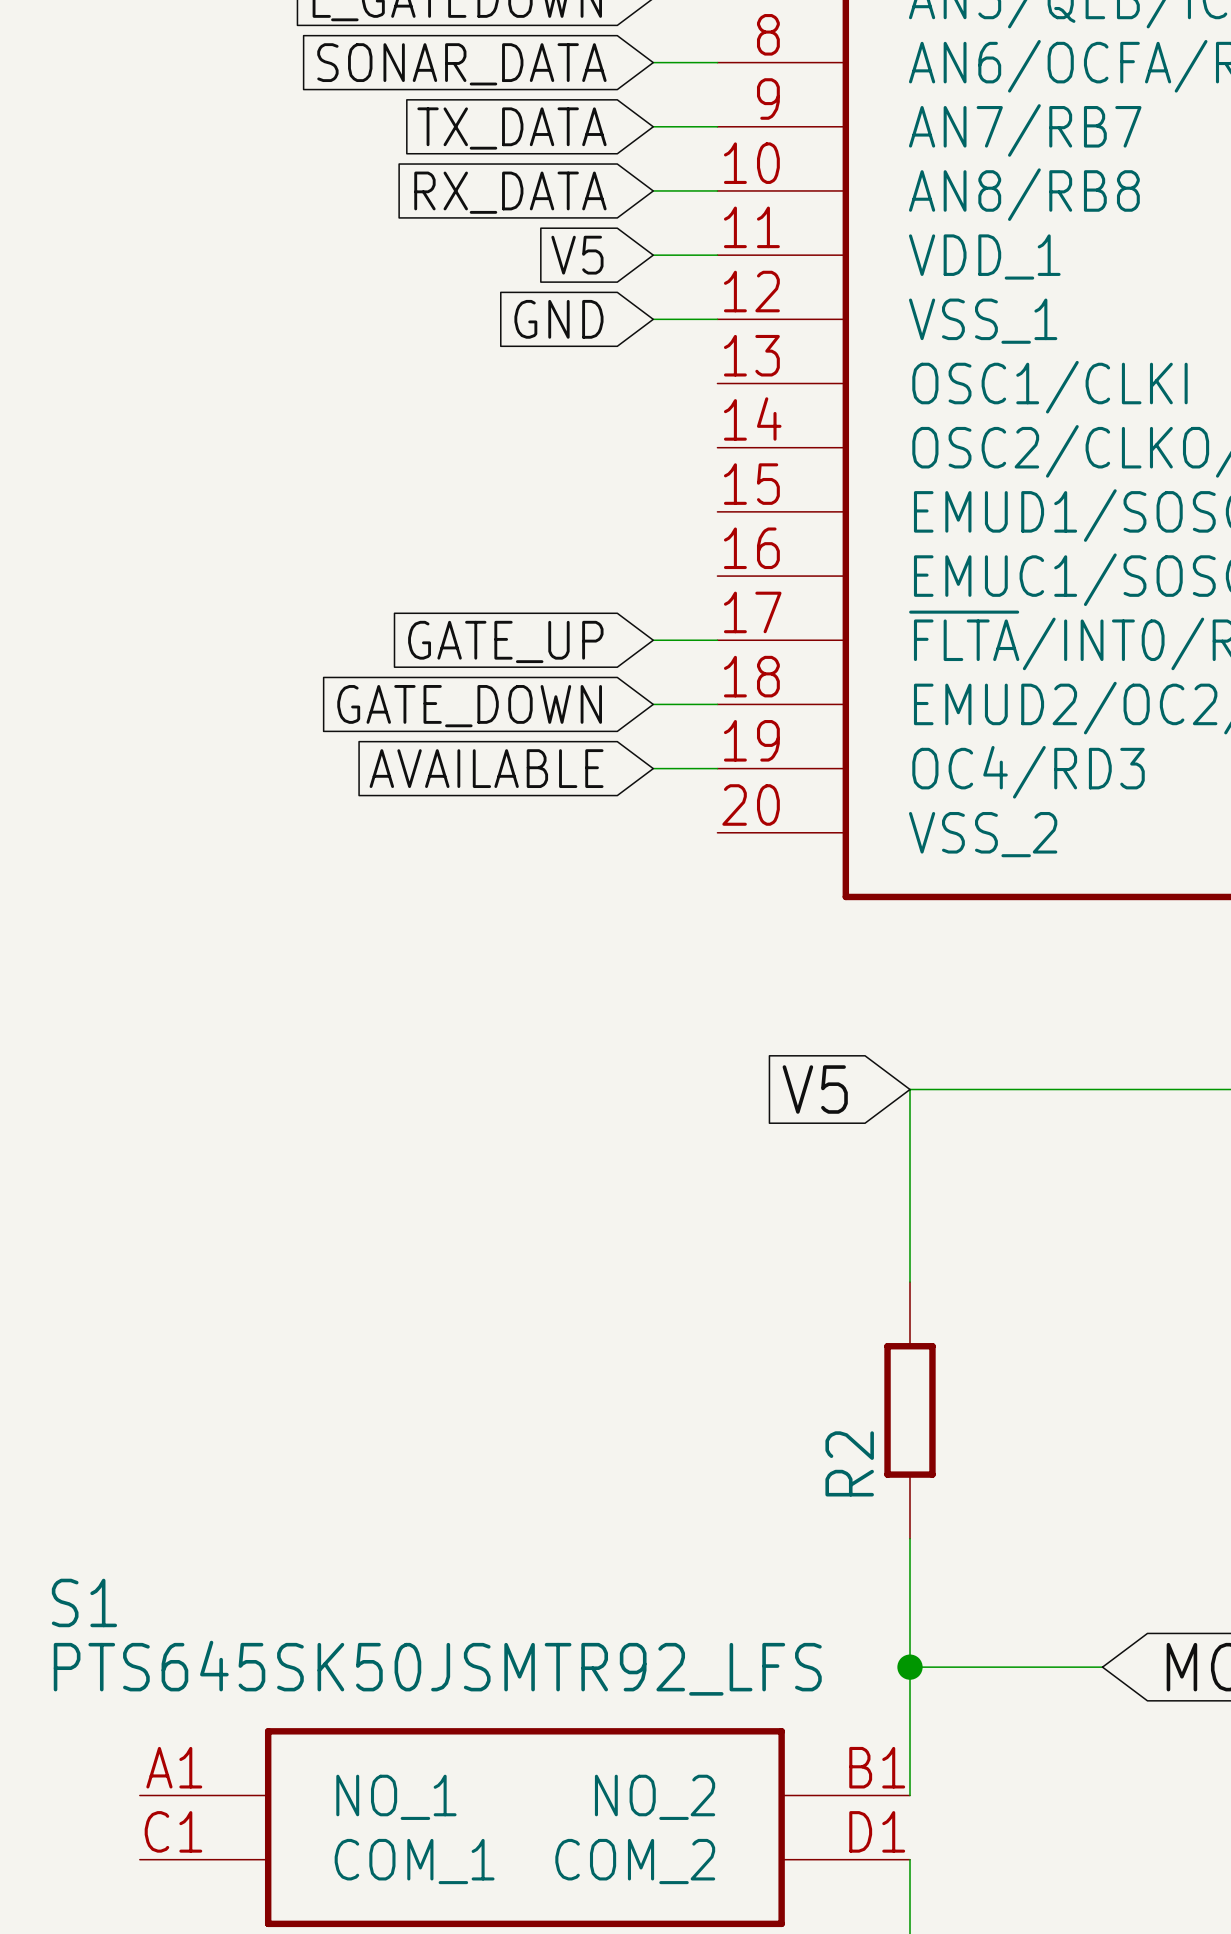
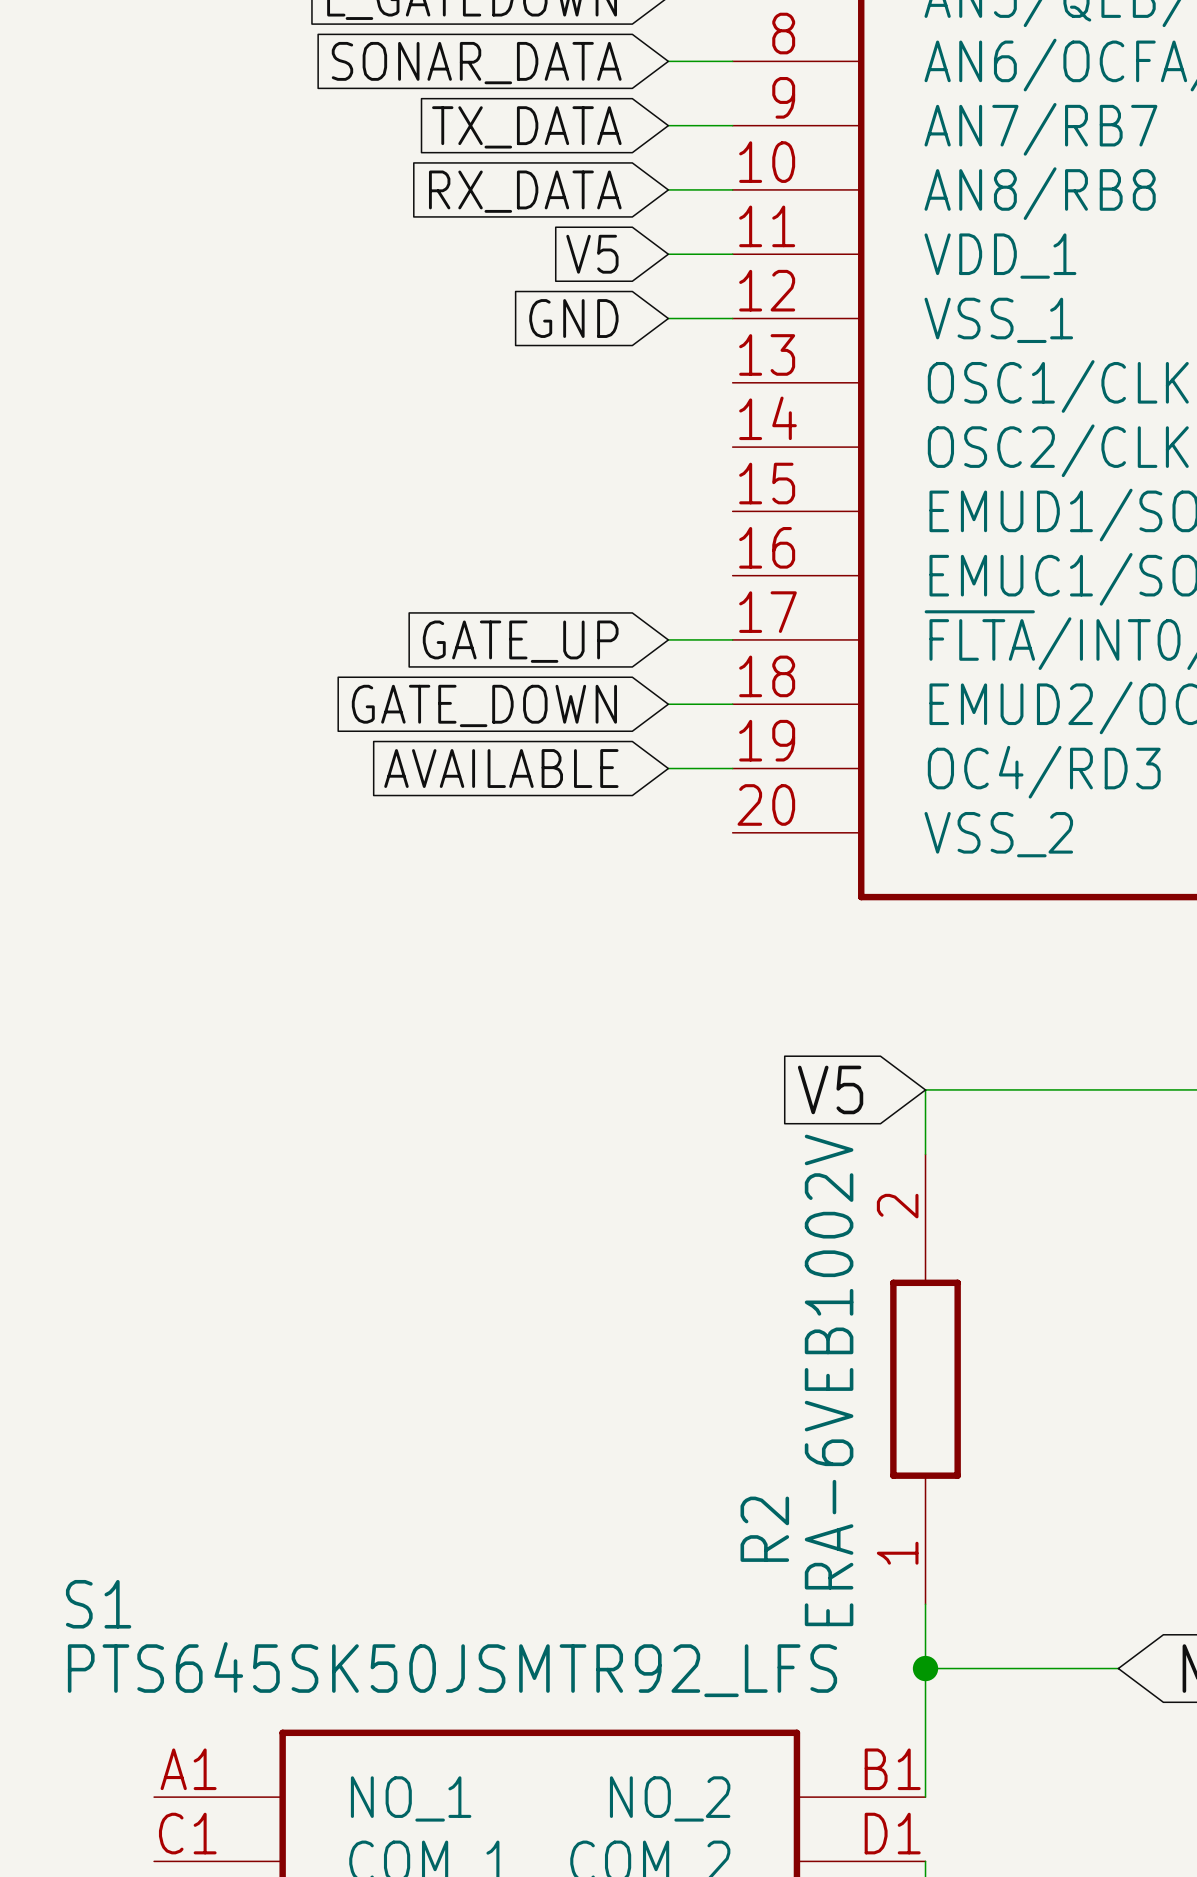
R2 symbol: [884, 1282, 936, 1539] -> [890, 1154, 961, 1605]
R2 value: none -> ERA-6VEB1002V (829, 1380)
R2 name position: R2 (849, 1463) -> R2 (764, 1529)

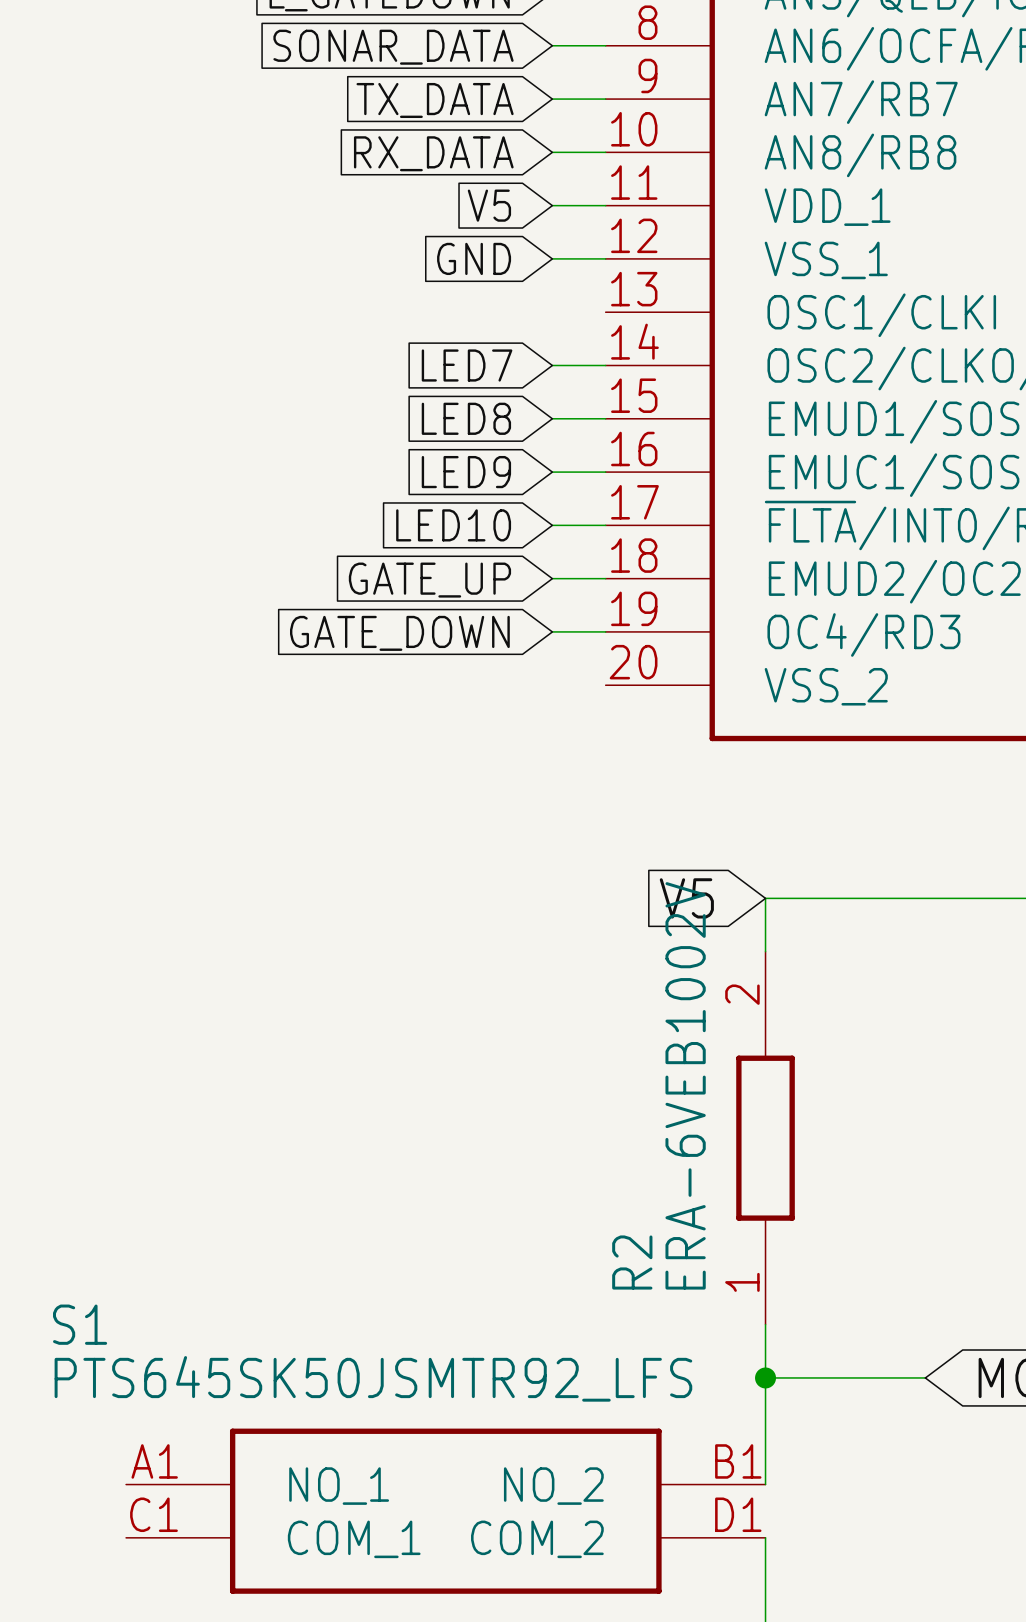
global label: none -> LED7 (467, 365)
wire: none -> (552, 365) (605, 365)
global label: none -> LED8 (466, 418)
wire: none -> (552, 418) (605, 418)
global label: none -> LED9 (466, 472)
wire: none -> (552, 472) (605, 472)
global label: GATE_UP (520, 641) -> LED10 (453, 525)
global label: GATE_DOWN (484, 705) -> GATE_UP (429, 580)
global label: AVAILABLE (501, 768) -> GATE_DOWN (399, 633)
R2 value position: ERA-6VEB1002V (829, 1380) -> ERA-6VEB1002V (685, 1085)

